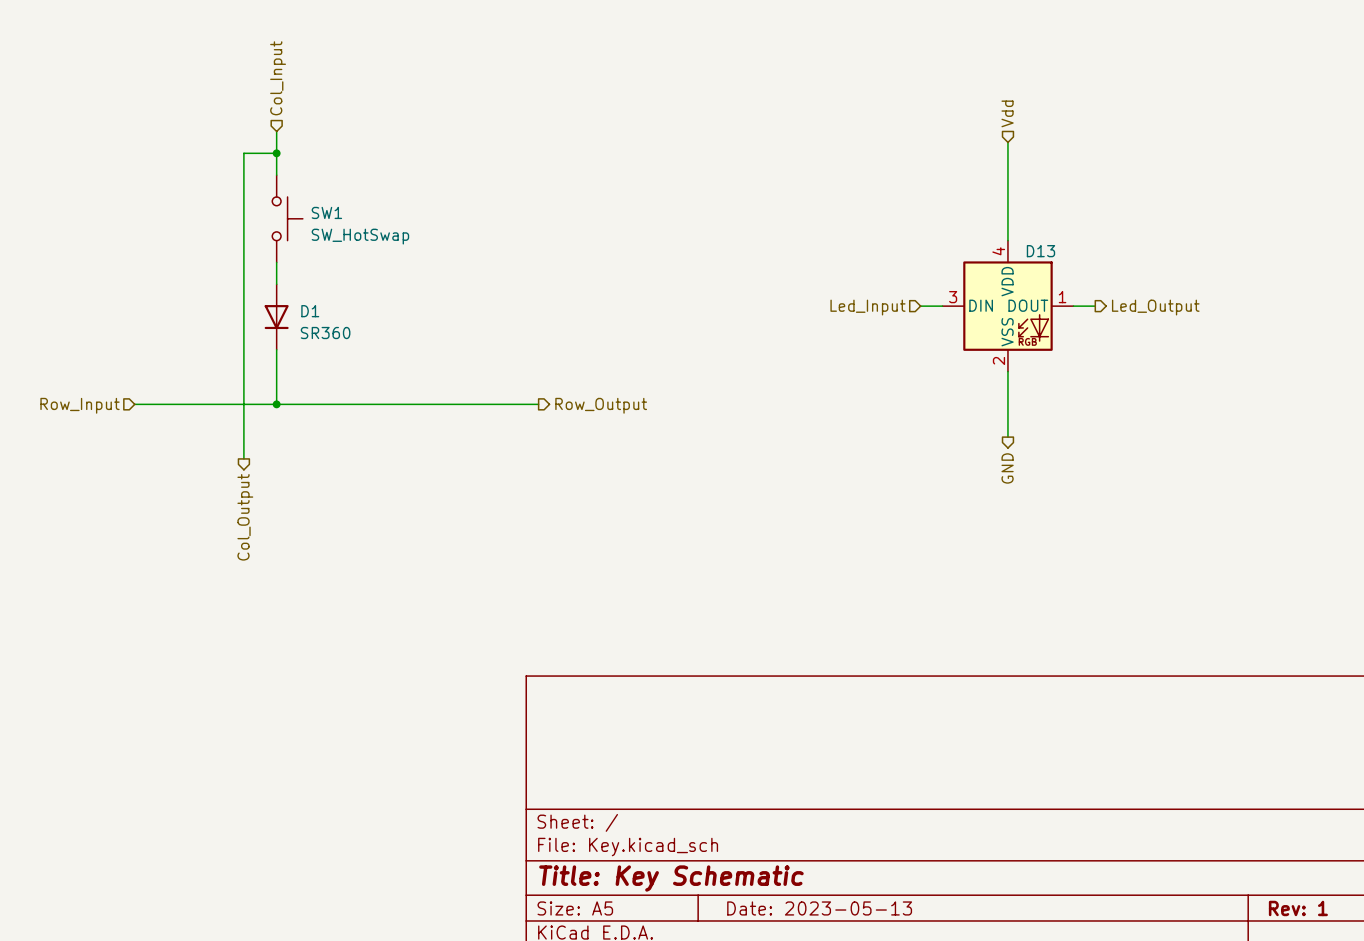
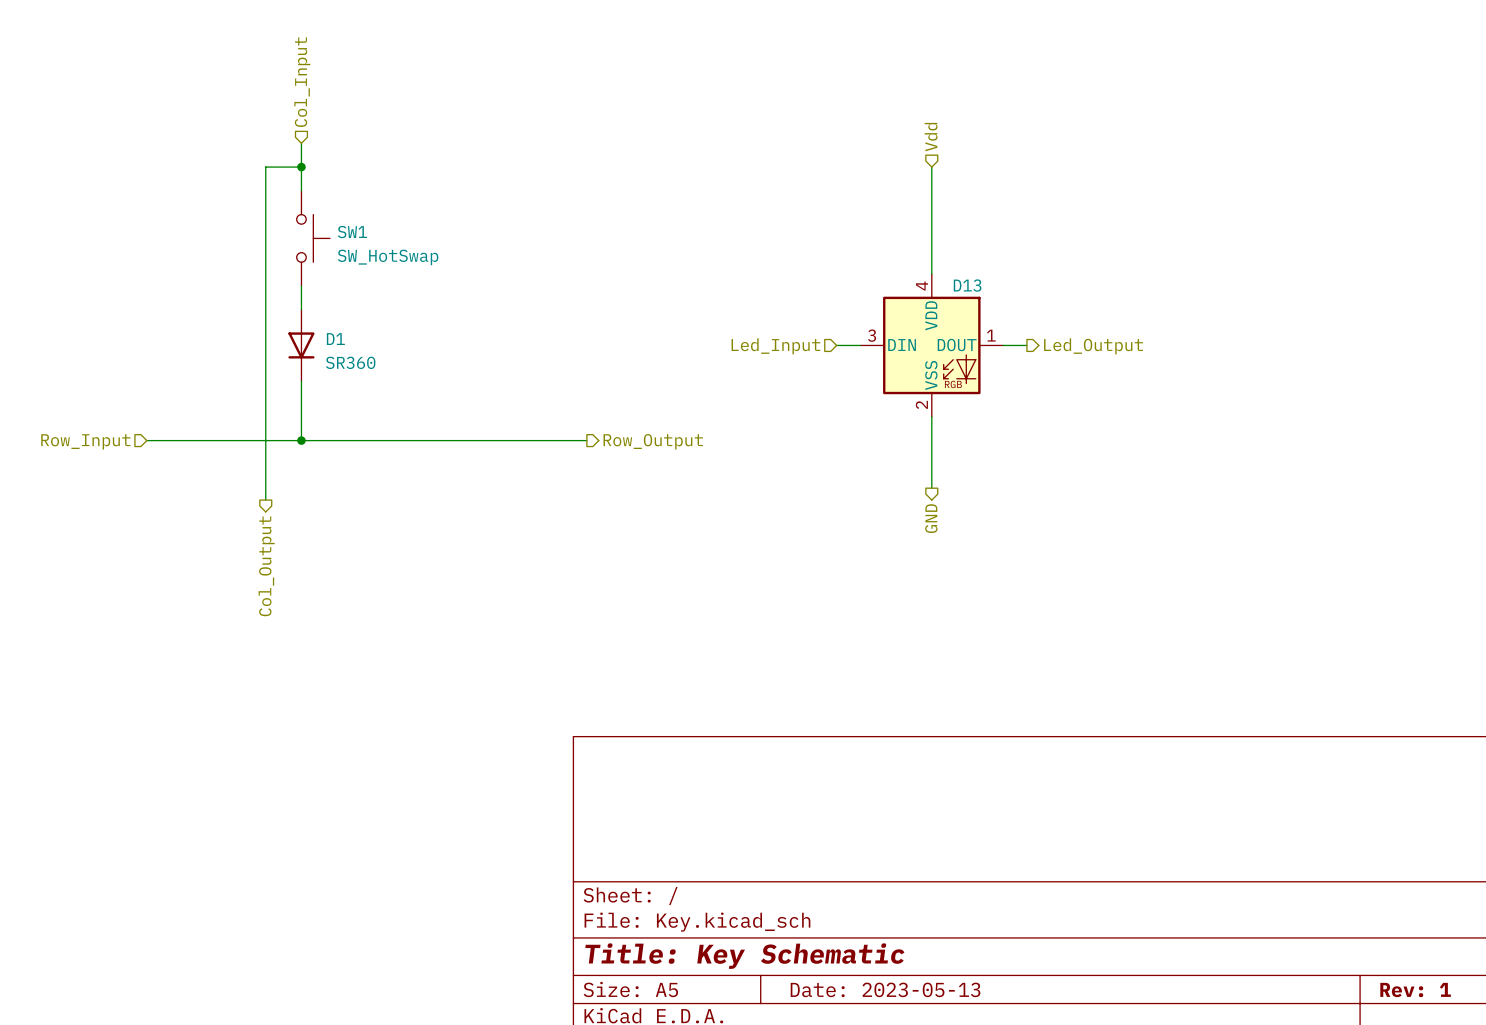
hierarchical label position: Vdd (1007, 113) -> Vdd (931, 137)
wire: (1007, 142) (1007, 240) -> (931, 167) (931, 274)
wire: (920, 306) (942, 306) -> (836, 345) (860, 345)
D13 position: (1007, 306) -> (931, 345)
wire: (1073, 306) (1095, 306) -> (1003, 345) (1026, 345)
hierarchical label position: Led_Input (867, 307) -> Led_Input (775, 346)
hierarchical label position: Led_Output (1155, 307) -> Led_Output (1093, 346)
wire: (1007, 371) (1007, 437) -> (931, 416) (931, 488)
hierarchical label position: GND (1007, 468) -> GND (931, 518)

